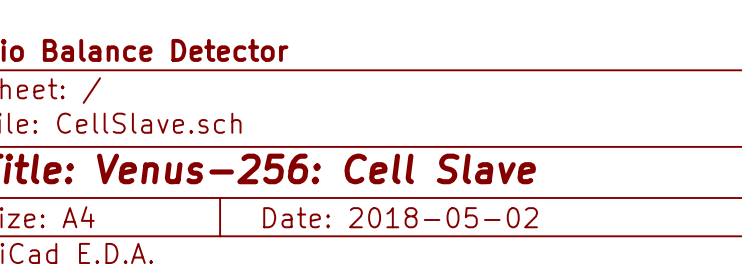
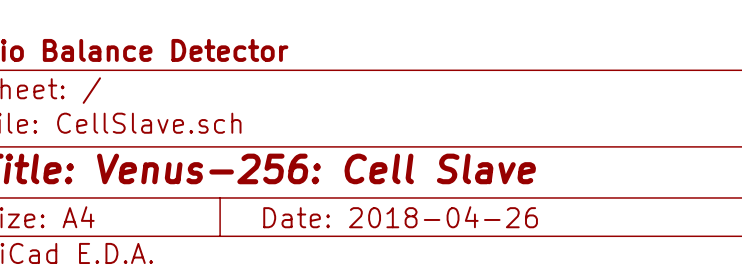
title block: Date: 2018-05-02 (400, 217) -> Date: 2018-04-26 (400, 217)

